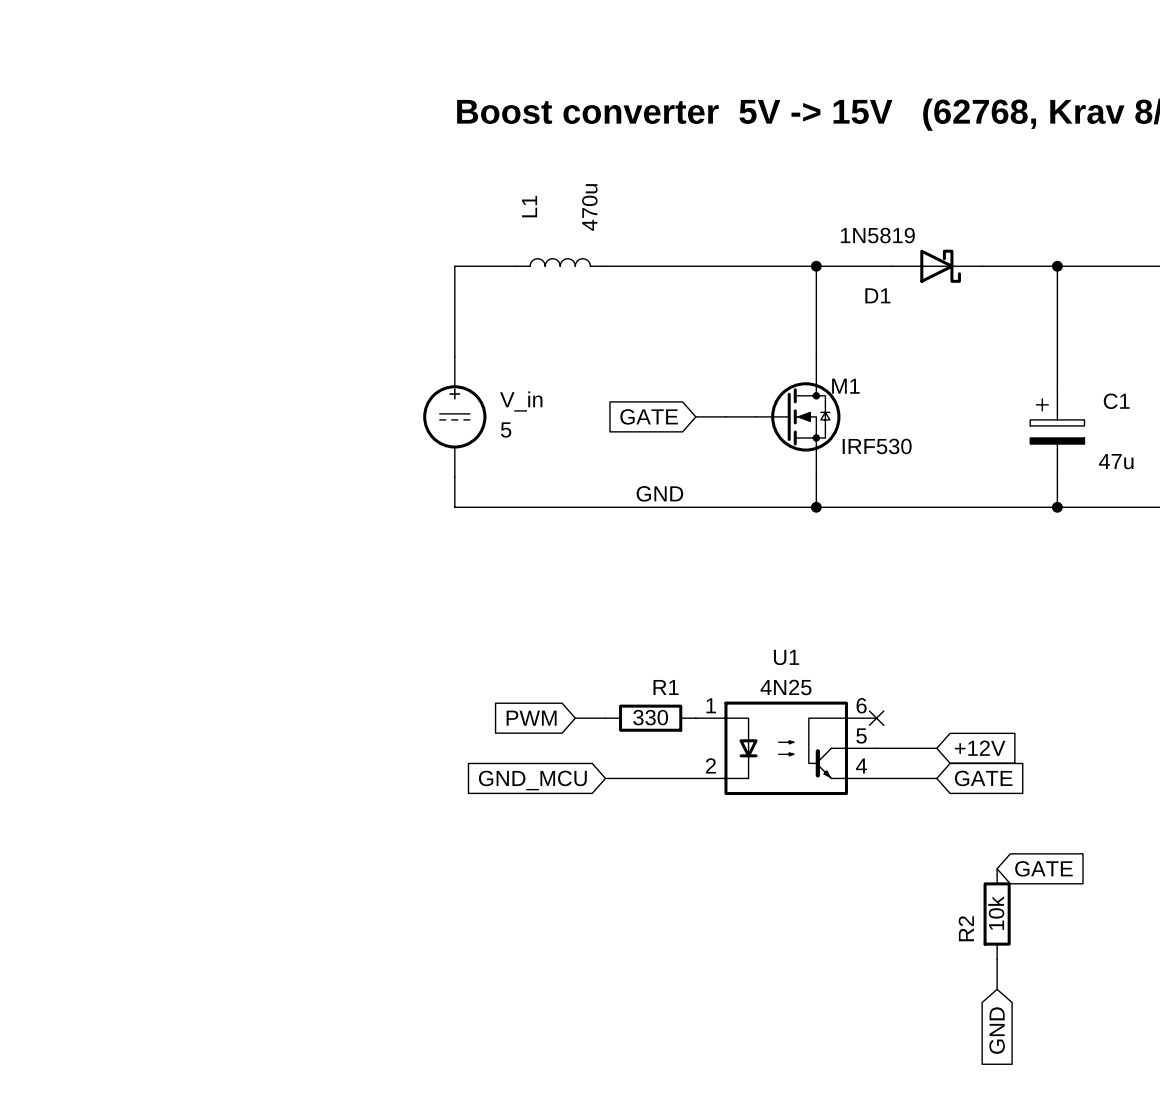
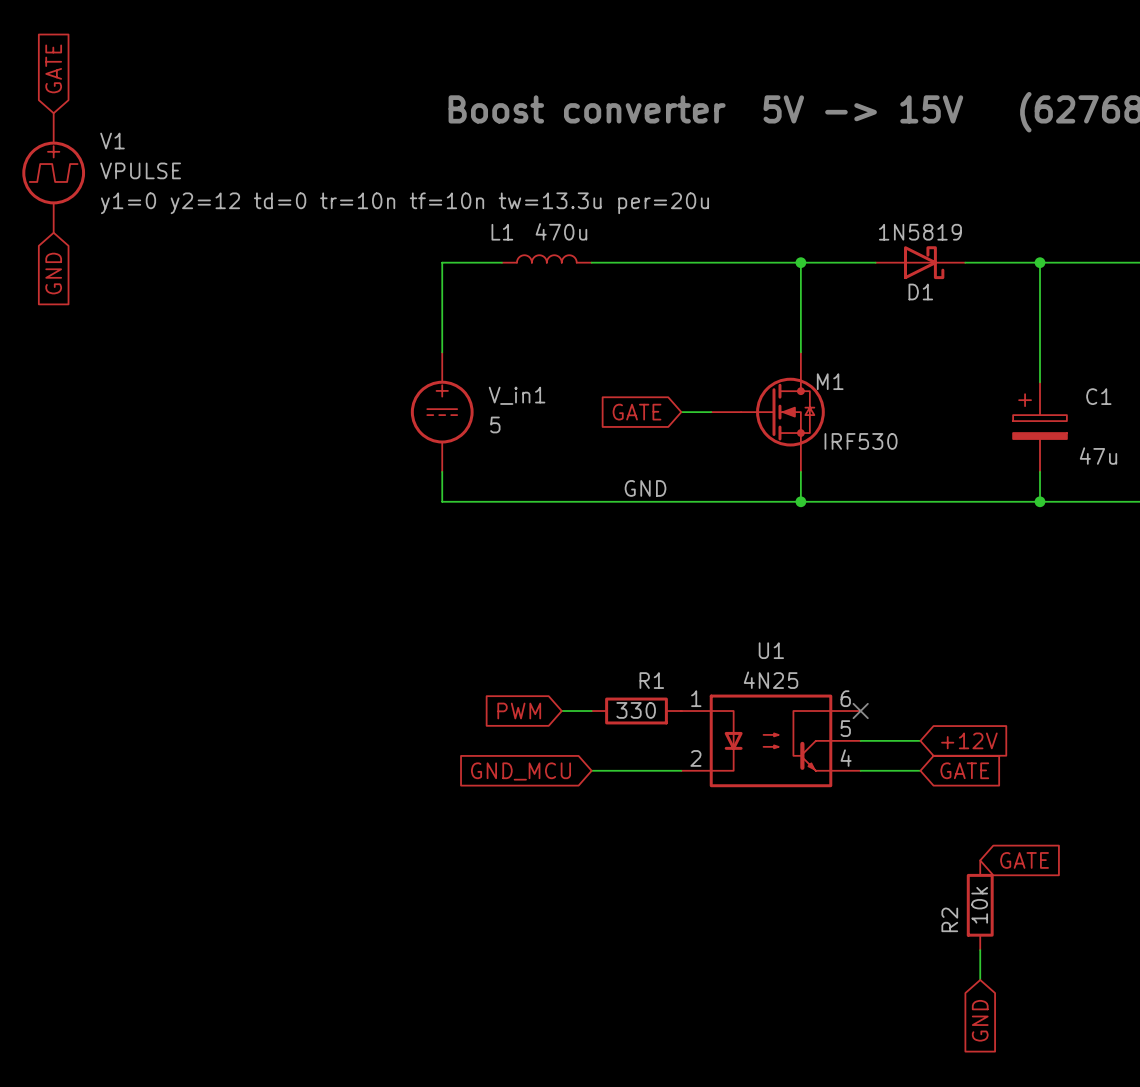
global label: none -> GATE (53, 68)
V1: none -> VPULSE (53, 173)
L1 name rotation: 0° (529, 206) -> 90° clockwise (502, 232)
L1 value rotation: 0° (589, 207) -> 90° clockwise (561, 231)
D1 value position: 1N5819 (877, 235) -> 1N5819 (920, 232)
global label: none -> GND (53, 273)
D1 name position: D1 (877, 295) -> D1 (920, 292)
V_in name: V_in (521, 401) -> V_in1 (517, 395)

